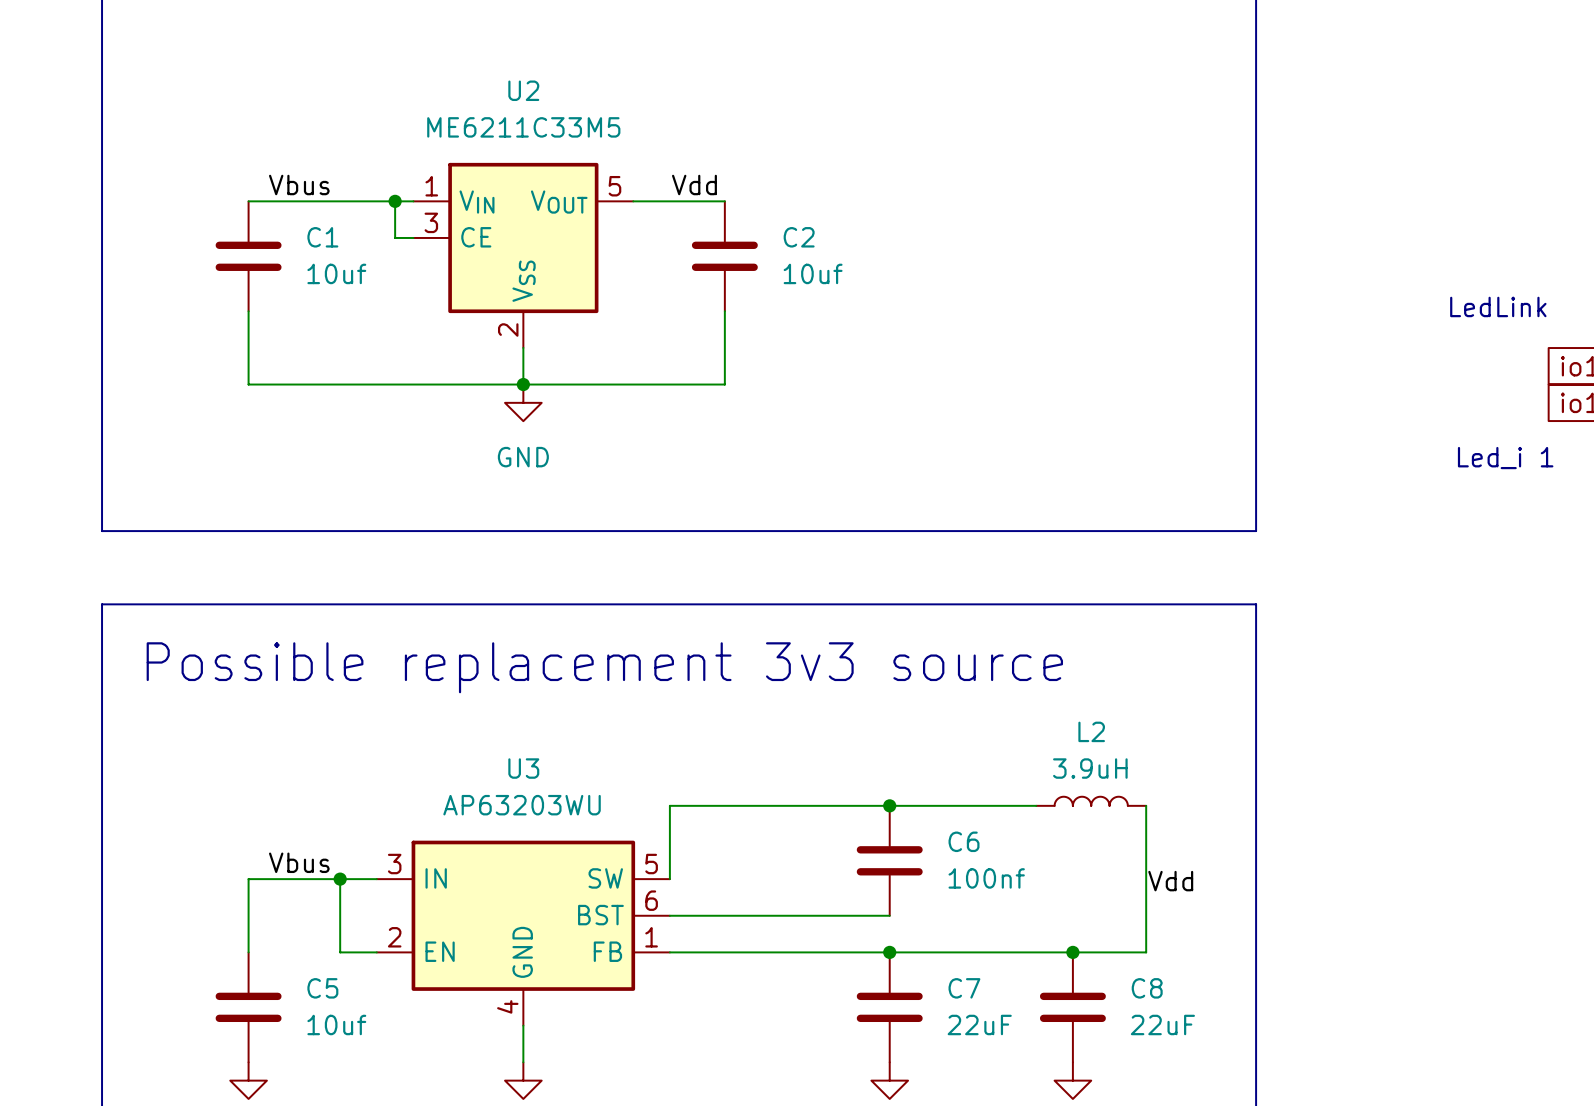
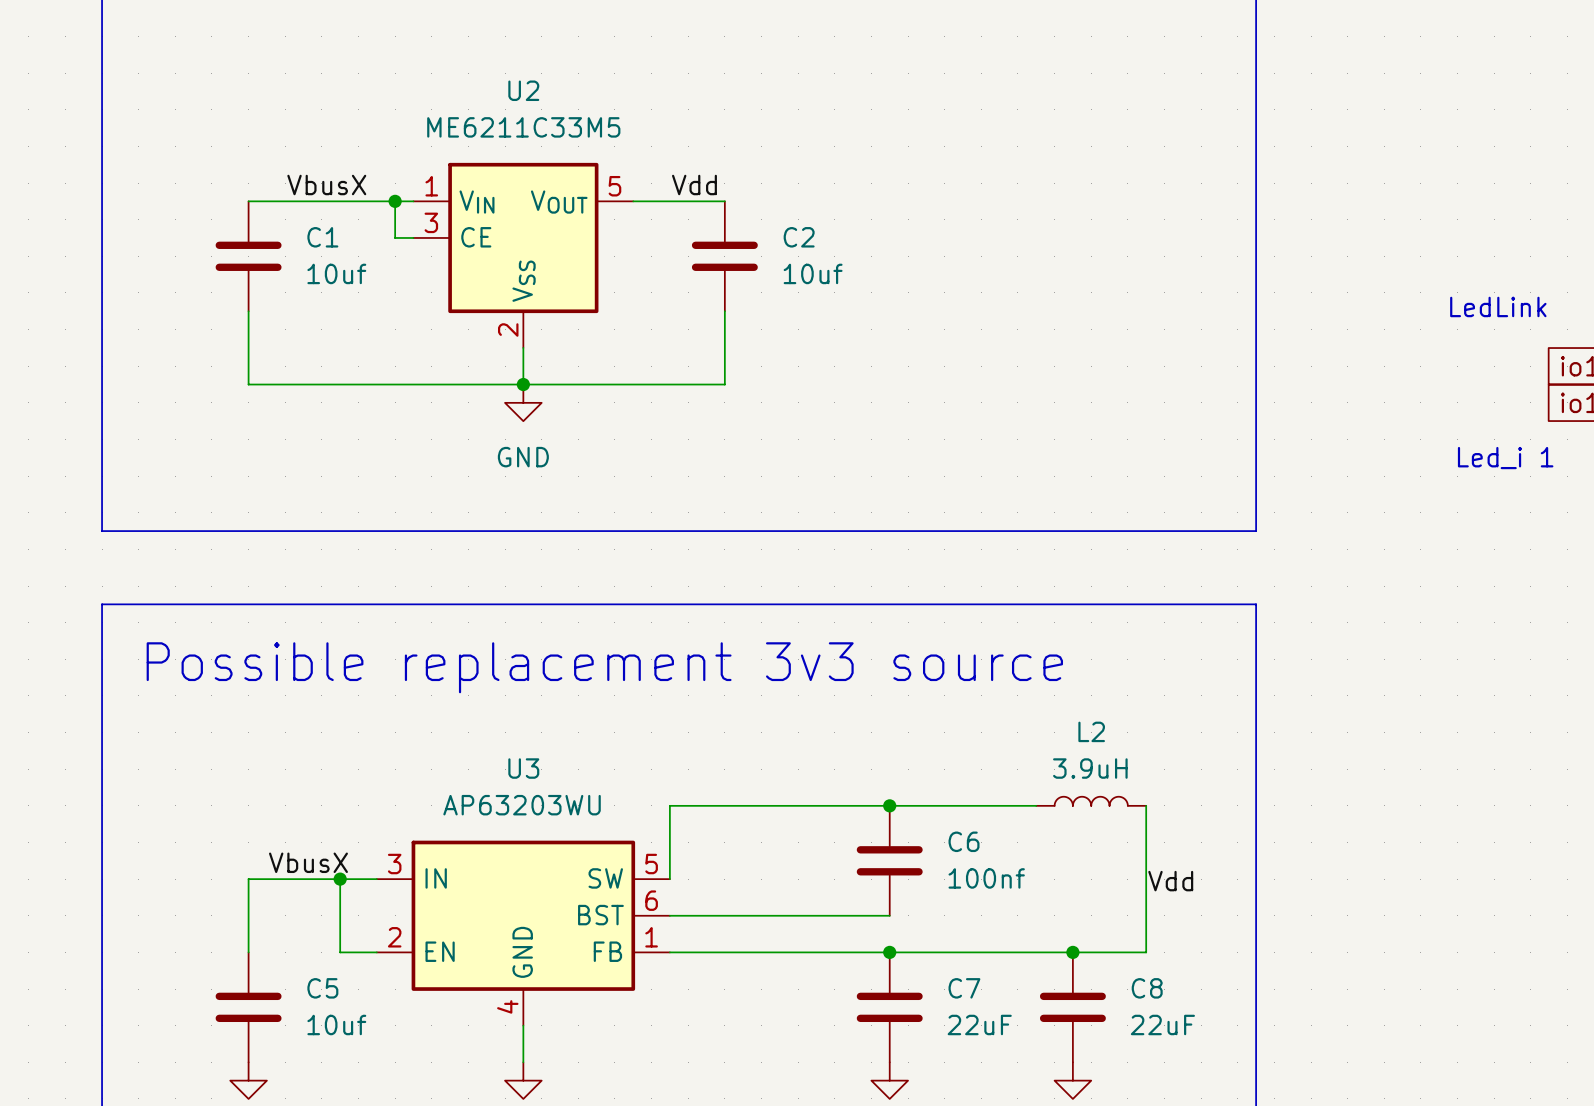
label: Vbus (299, 185) -> VbusX (326, 185)
label: Vbus (299, 862) -> VbusX (308, 862)

